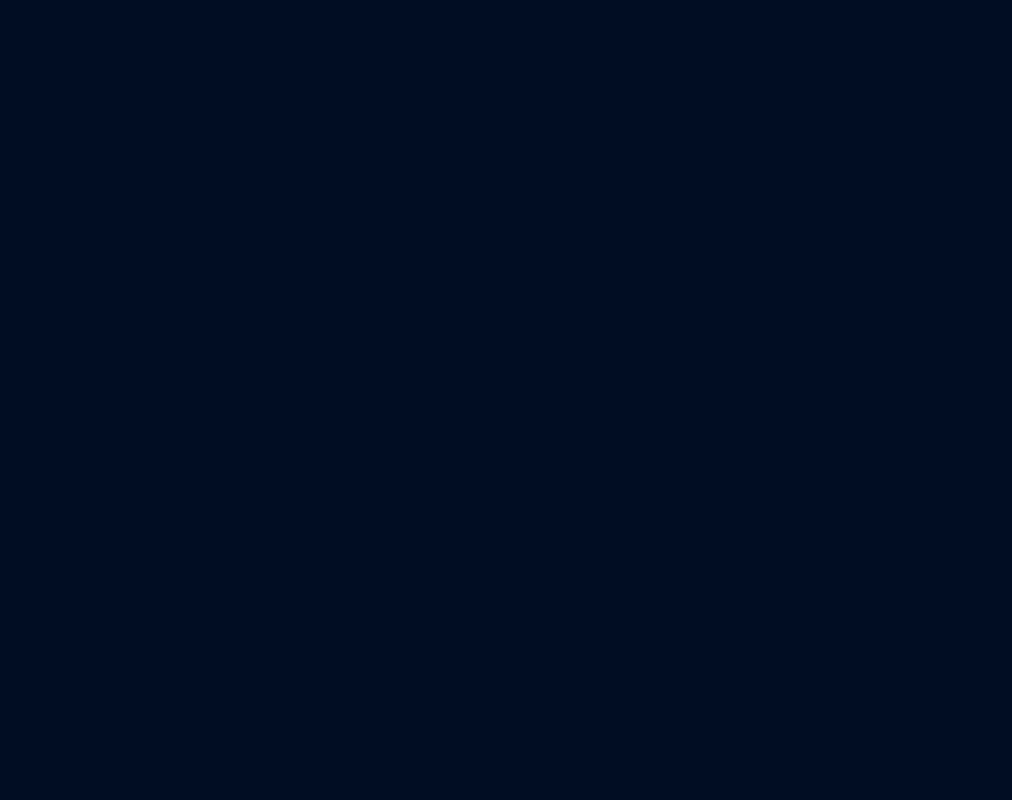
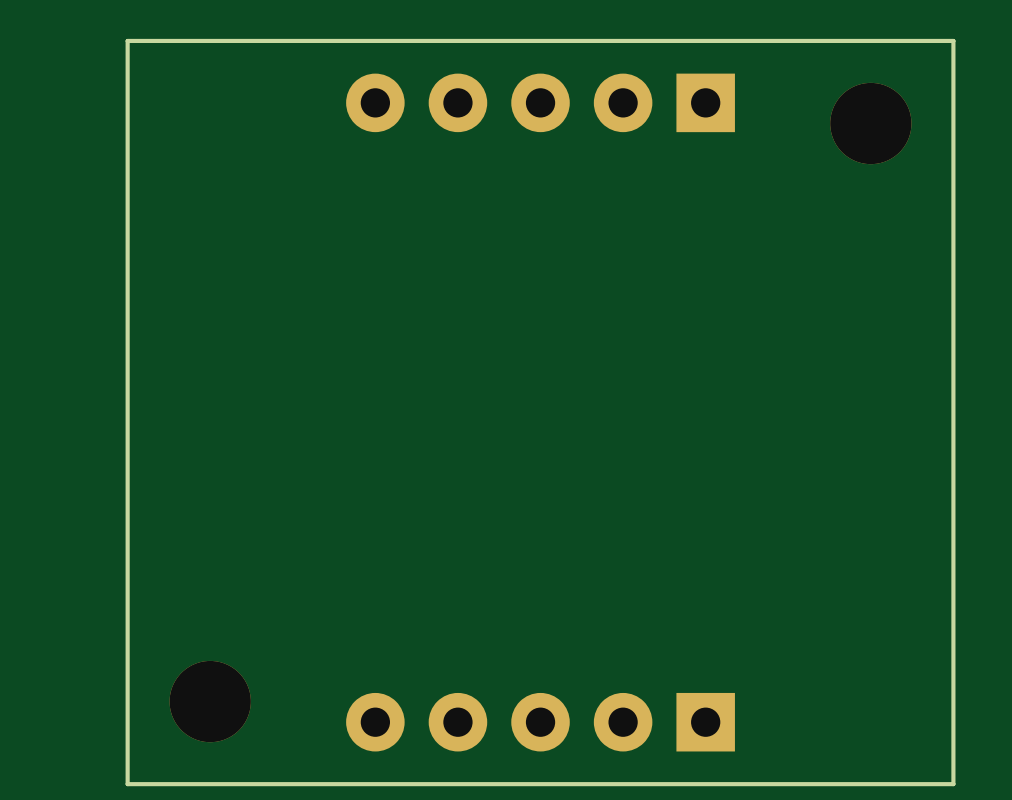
board edge: none -> (953, 40) (953, 784) (127, 784) (127, 40) (953, 40)
part: none -> (540, 102)
part: none -> (870, 123)
part: none -> (210, 701)
part: none -> (540, 722)

